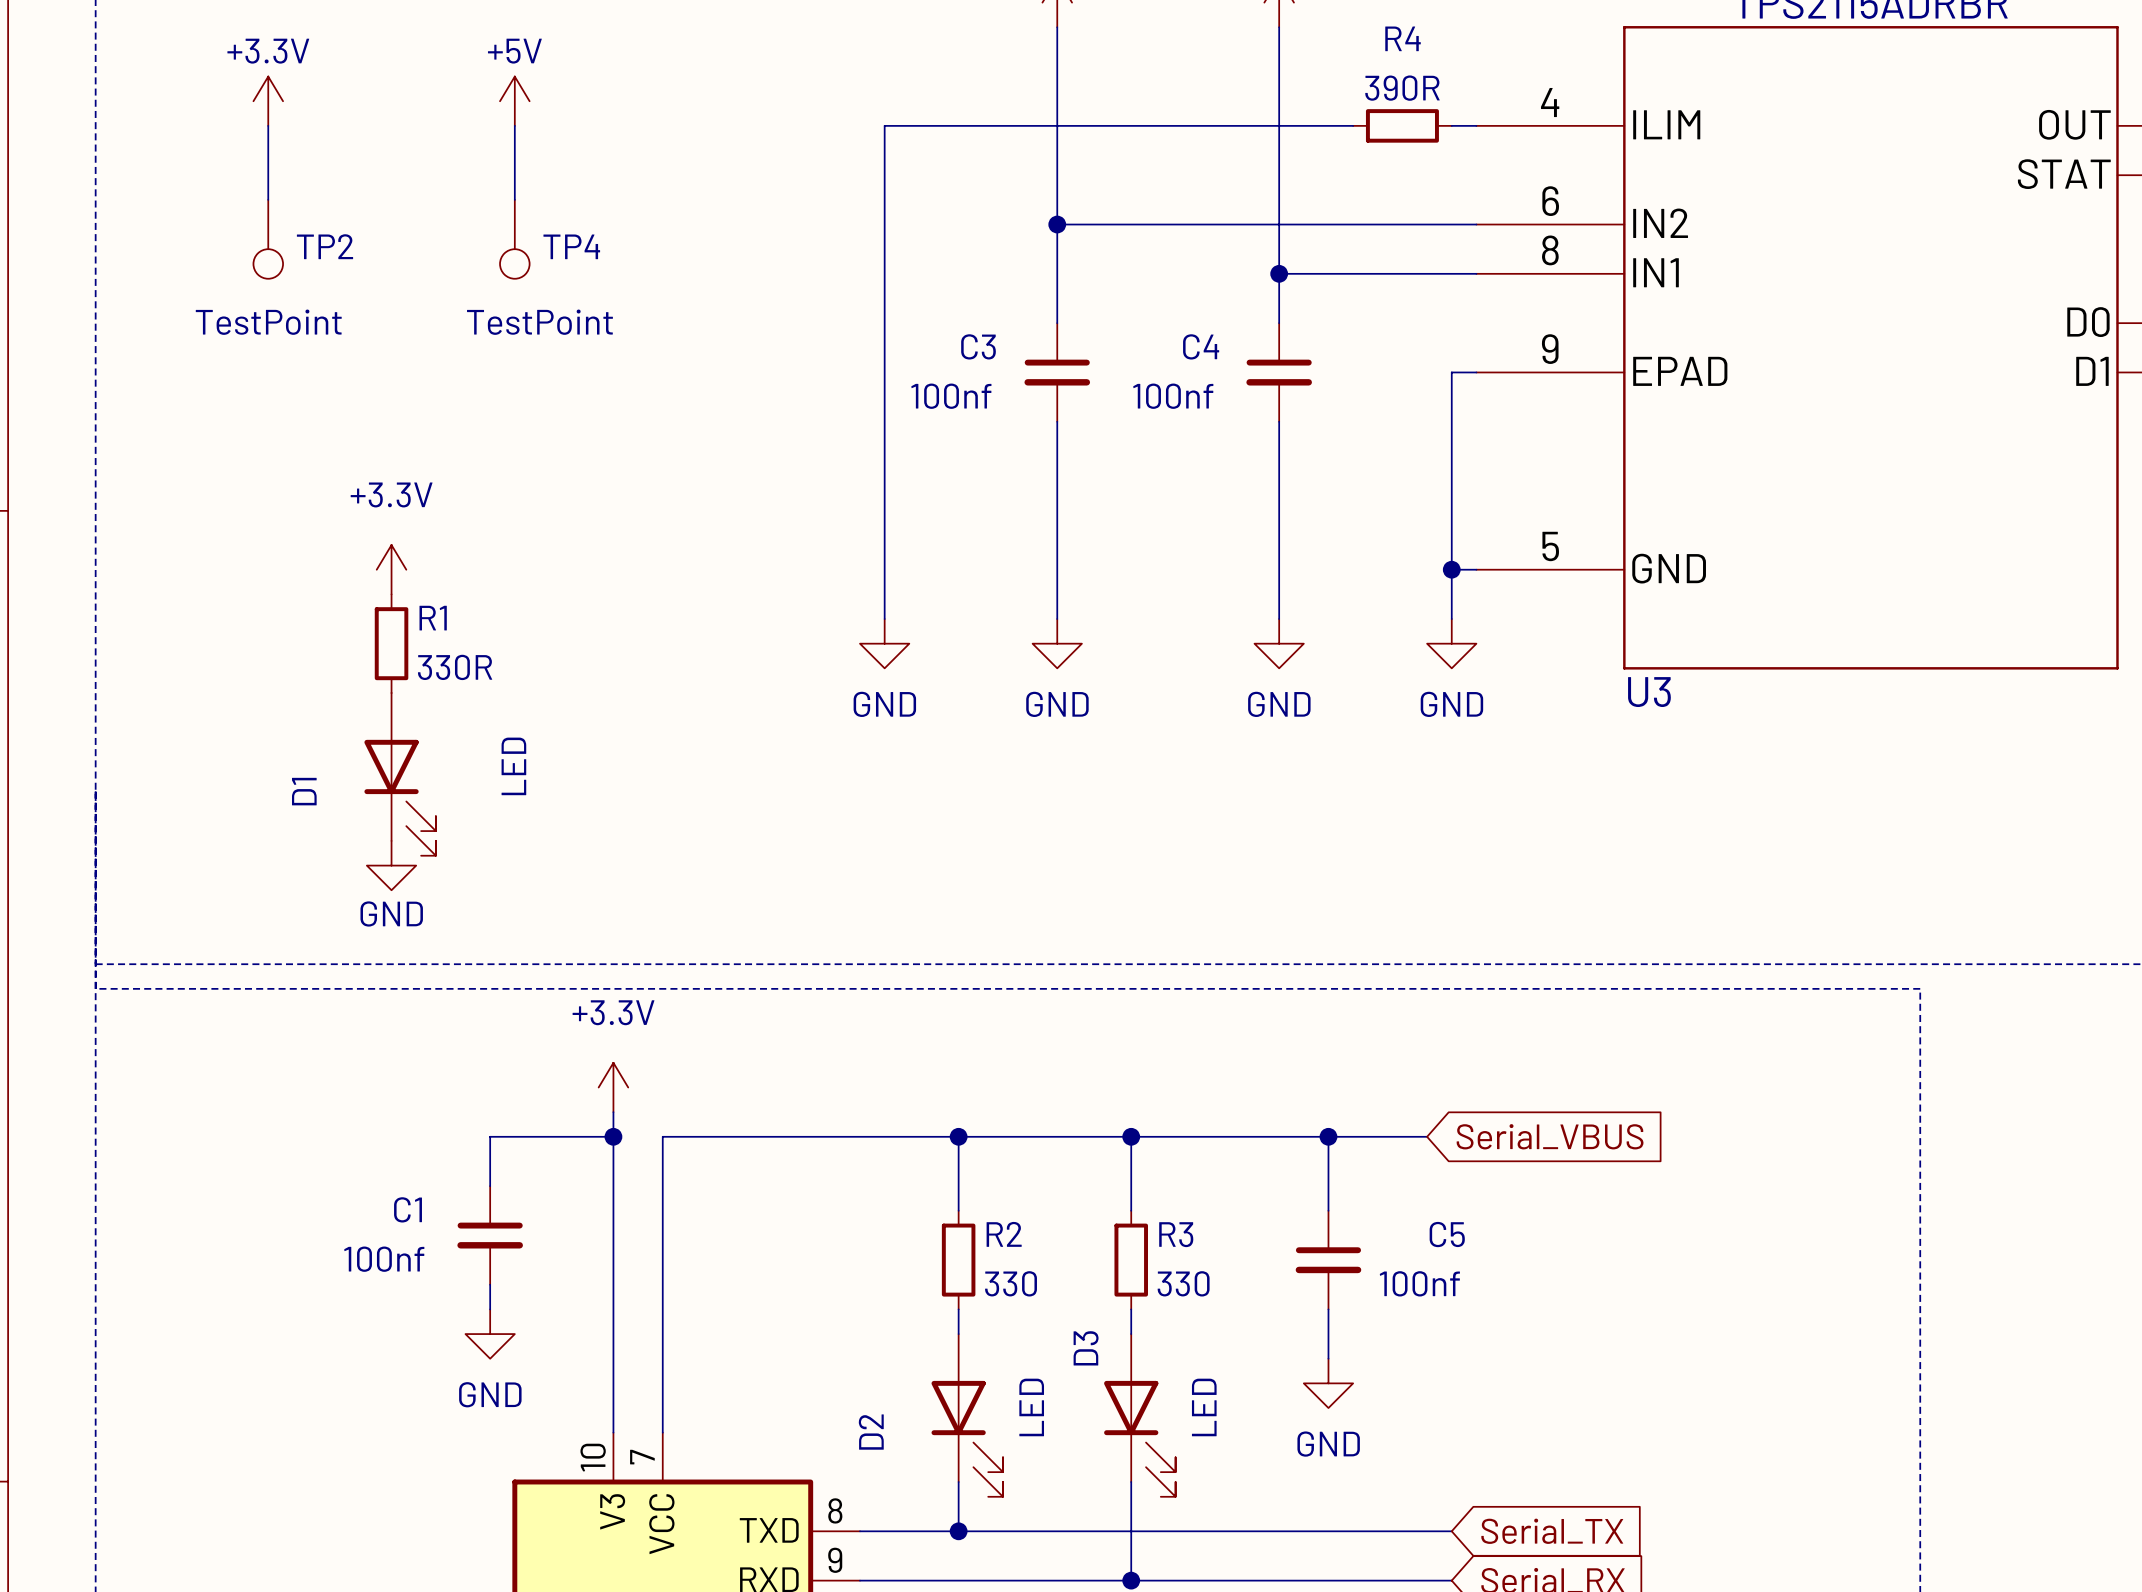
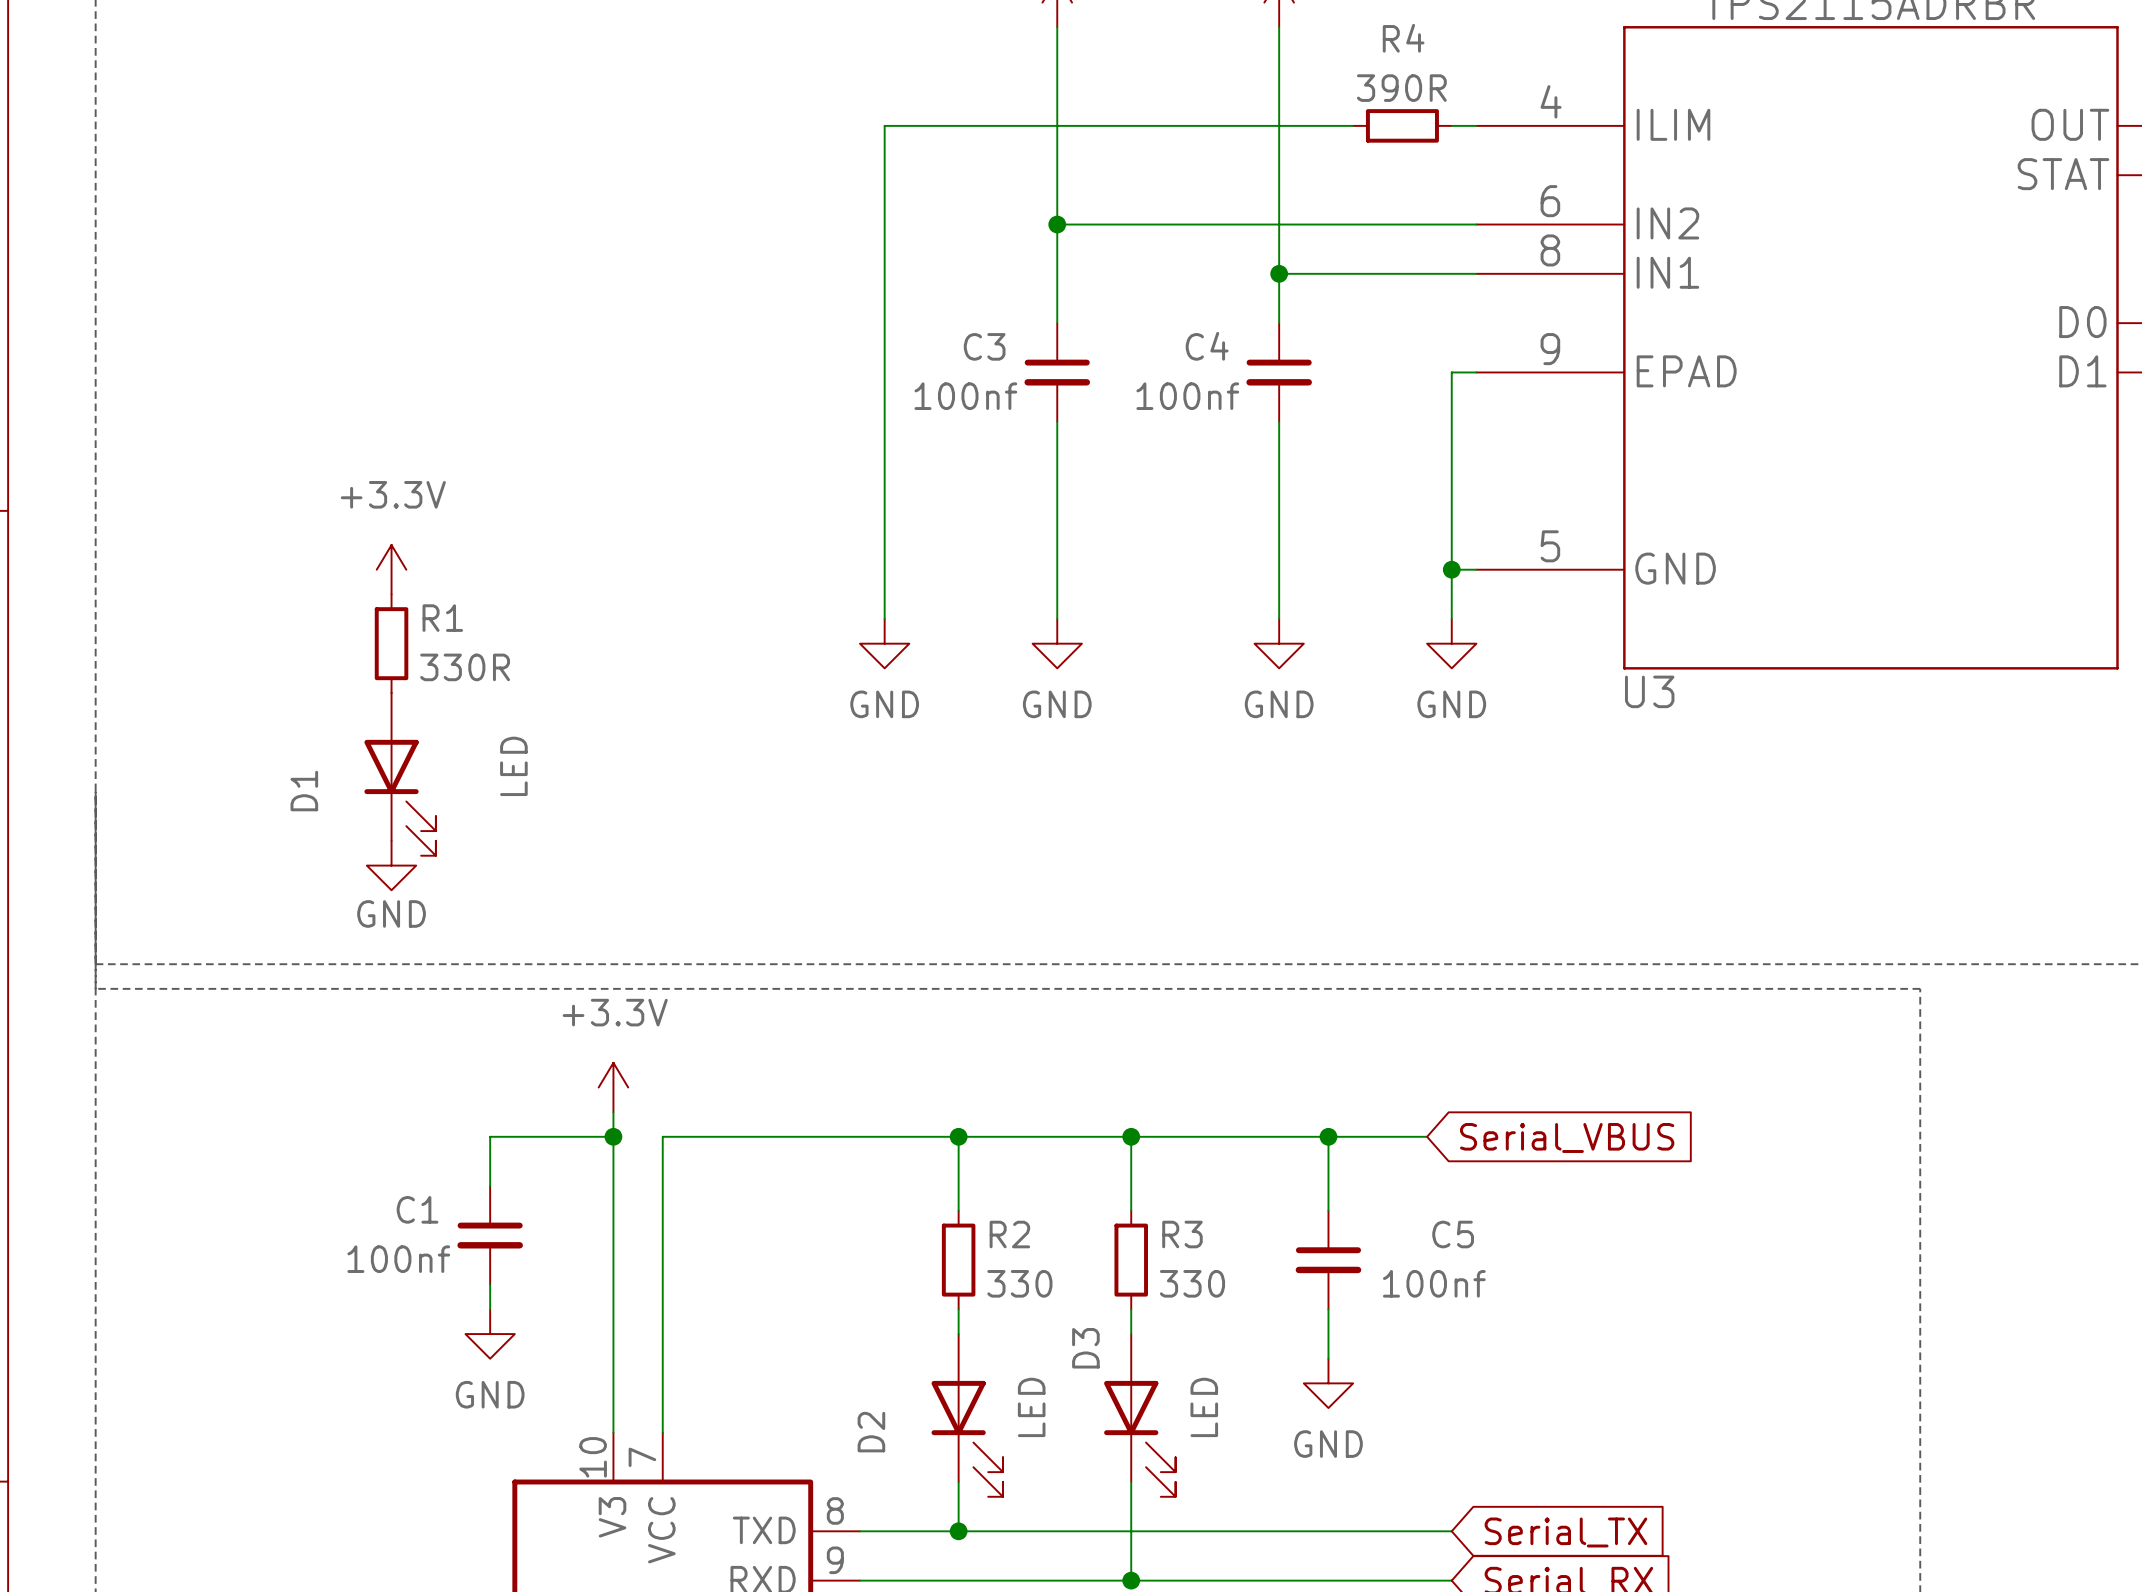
power symbol: +3.3V (268, 101) -> none
power symbol: +5V (514, 101) -> none
wire: (268, 125) (268, 199) -> none
wire: (514, 125) (514, 199) -> none
TP2: TestPoint (268, 239) -> none
TP4: TestPoint (514, 239) -> none

